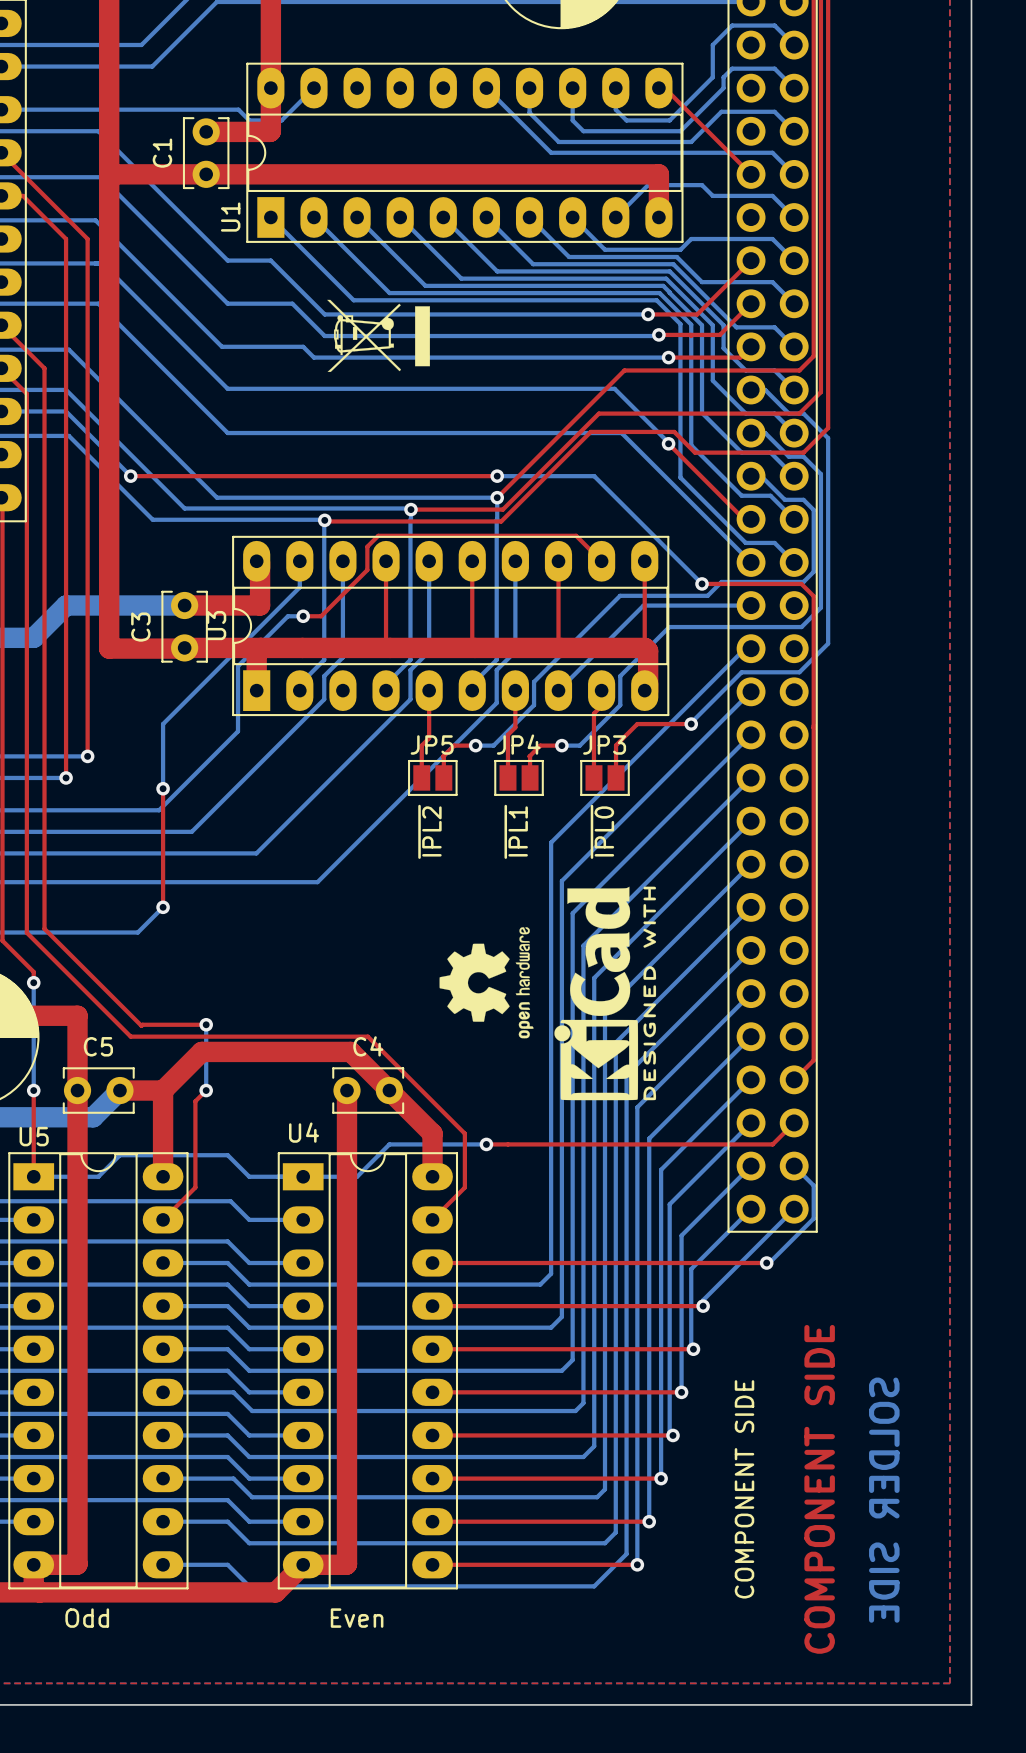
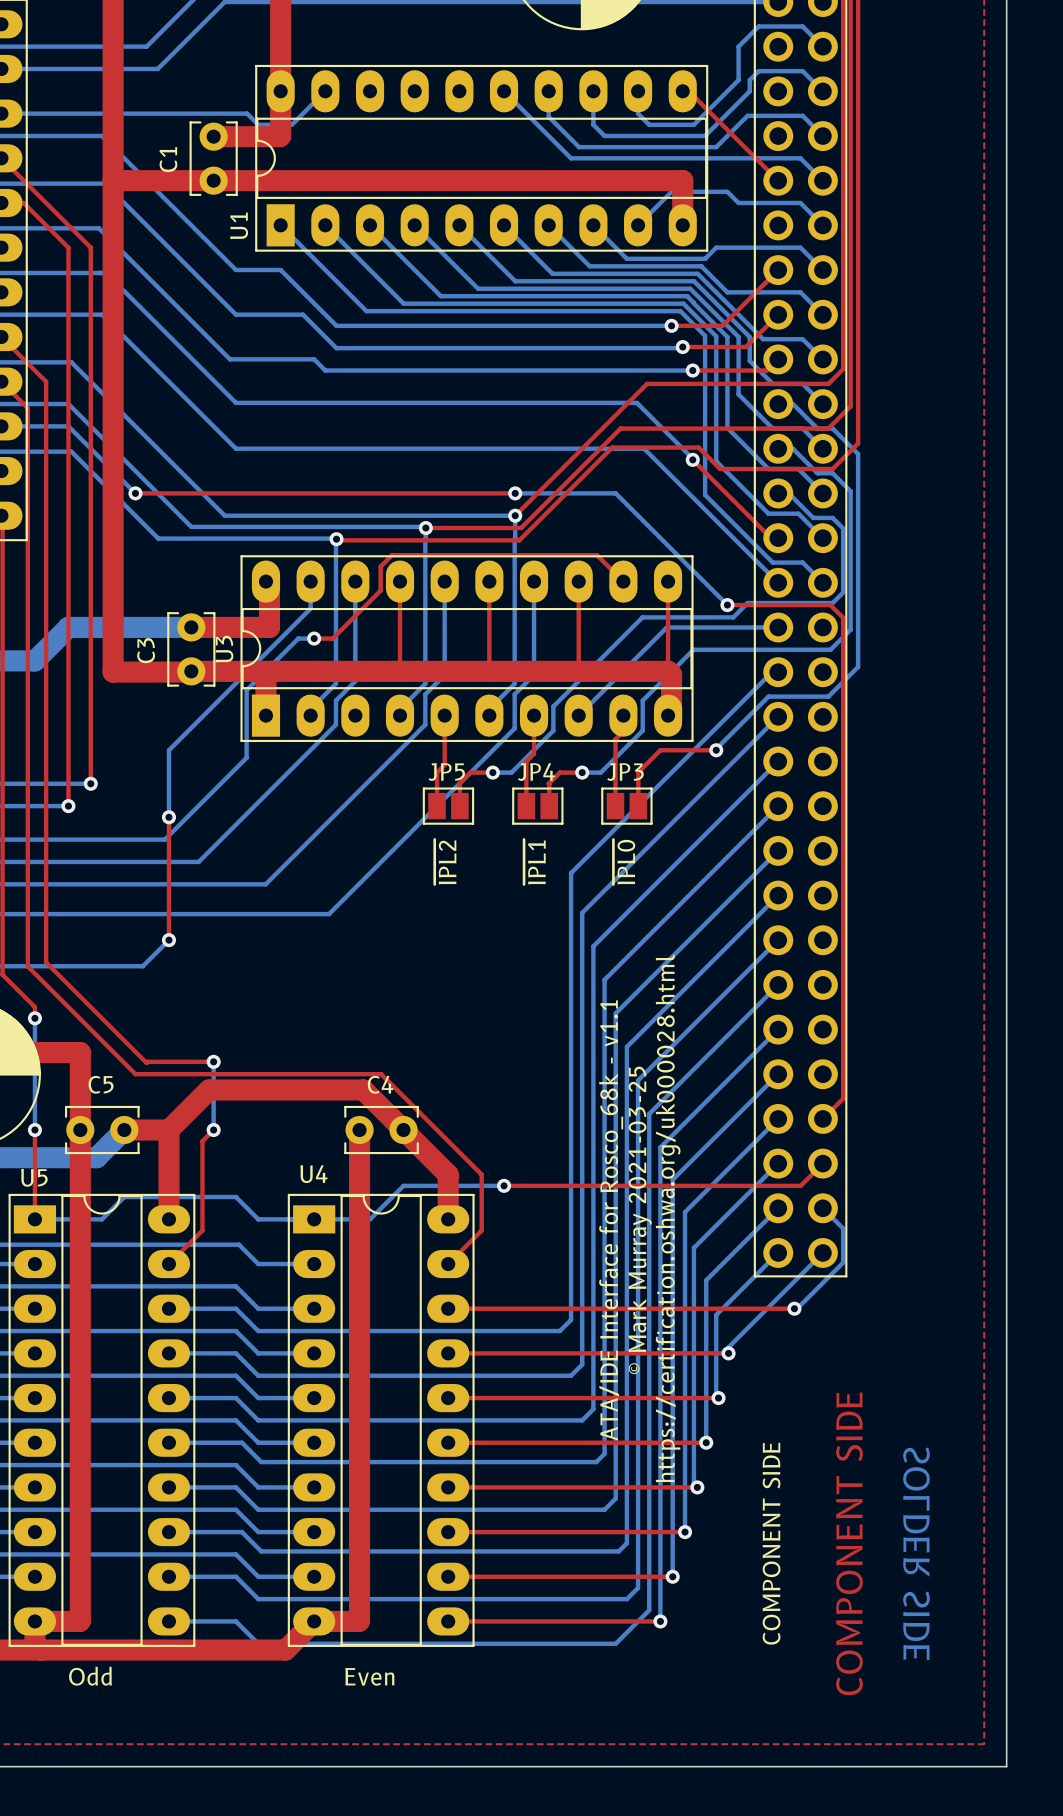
drawing: [327, 299, 430, 372] -> none
drawing: [554, 886, 657, 1101] -> none
drawing: [439, 927, 534, 1039] -> none
text: none -> https://certification.oshwa.org/uk000028.html (668, 1218)
text: none -> © Mark Murray 2021-03-25 (639, 1220)
text: none -> ATA/IDE Interface for Rosco_68k - v1.1 (611, 1220)

